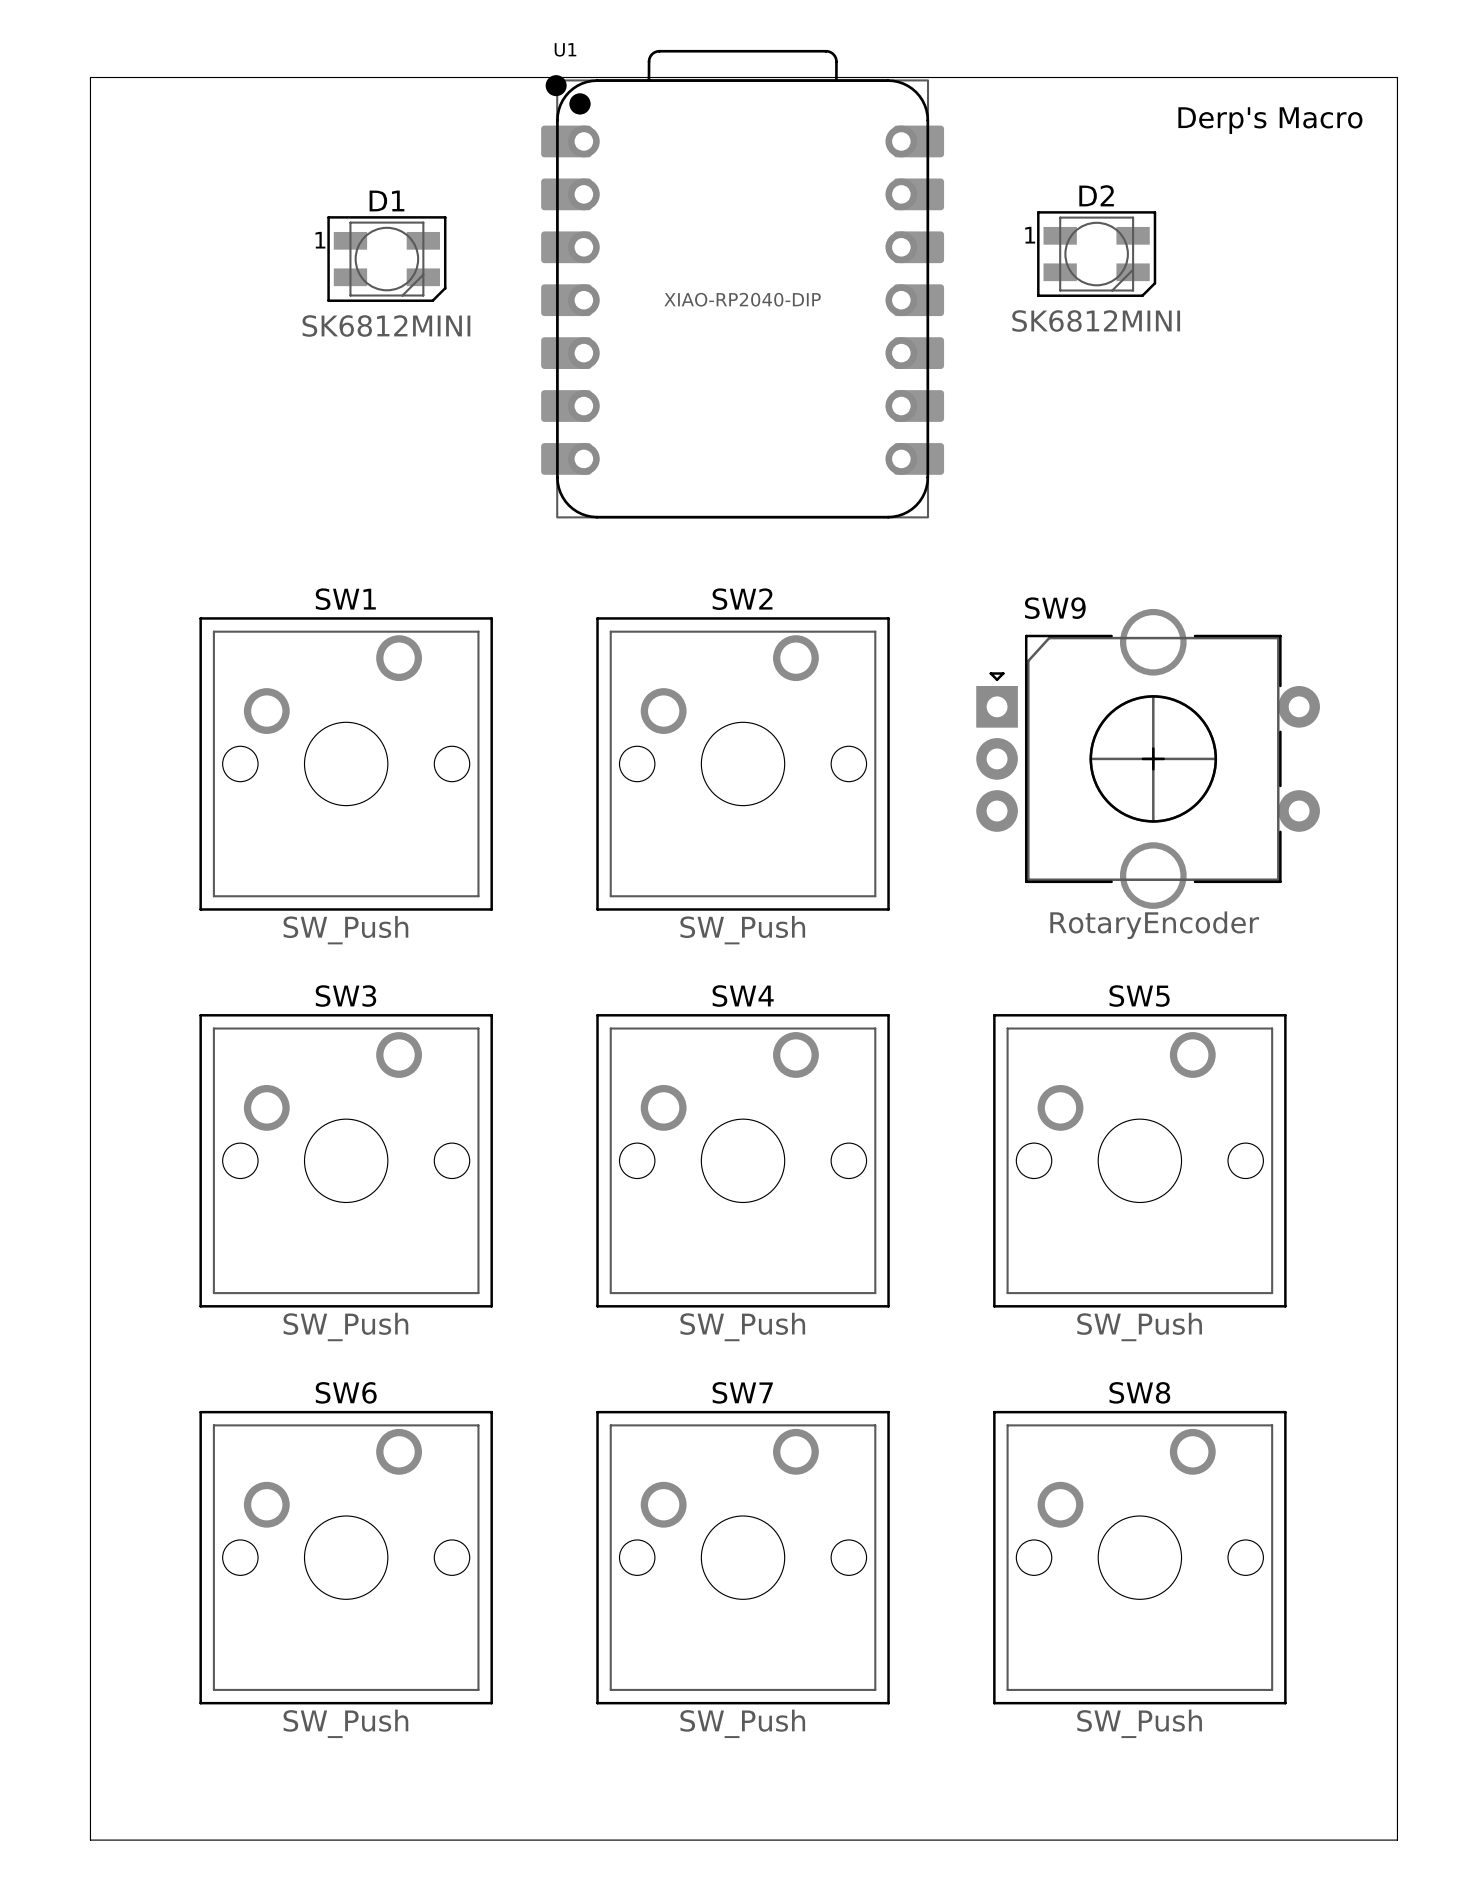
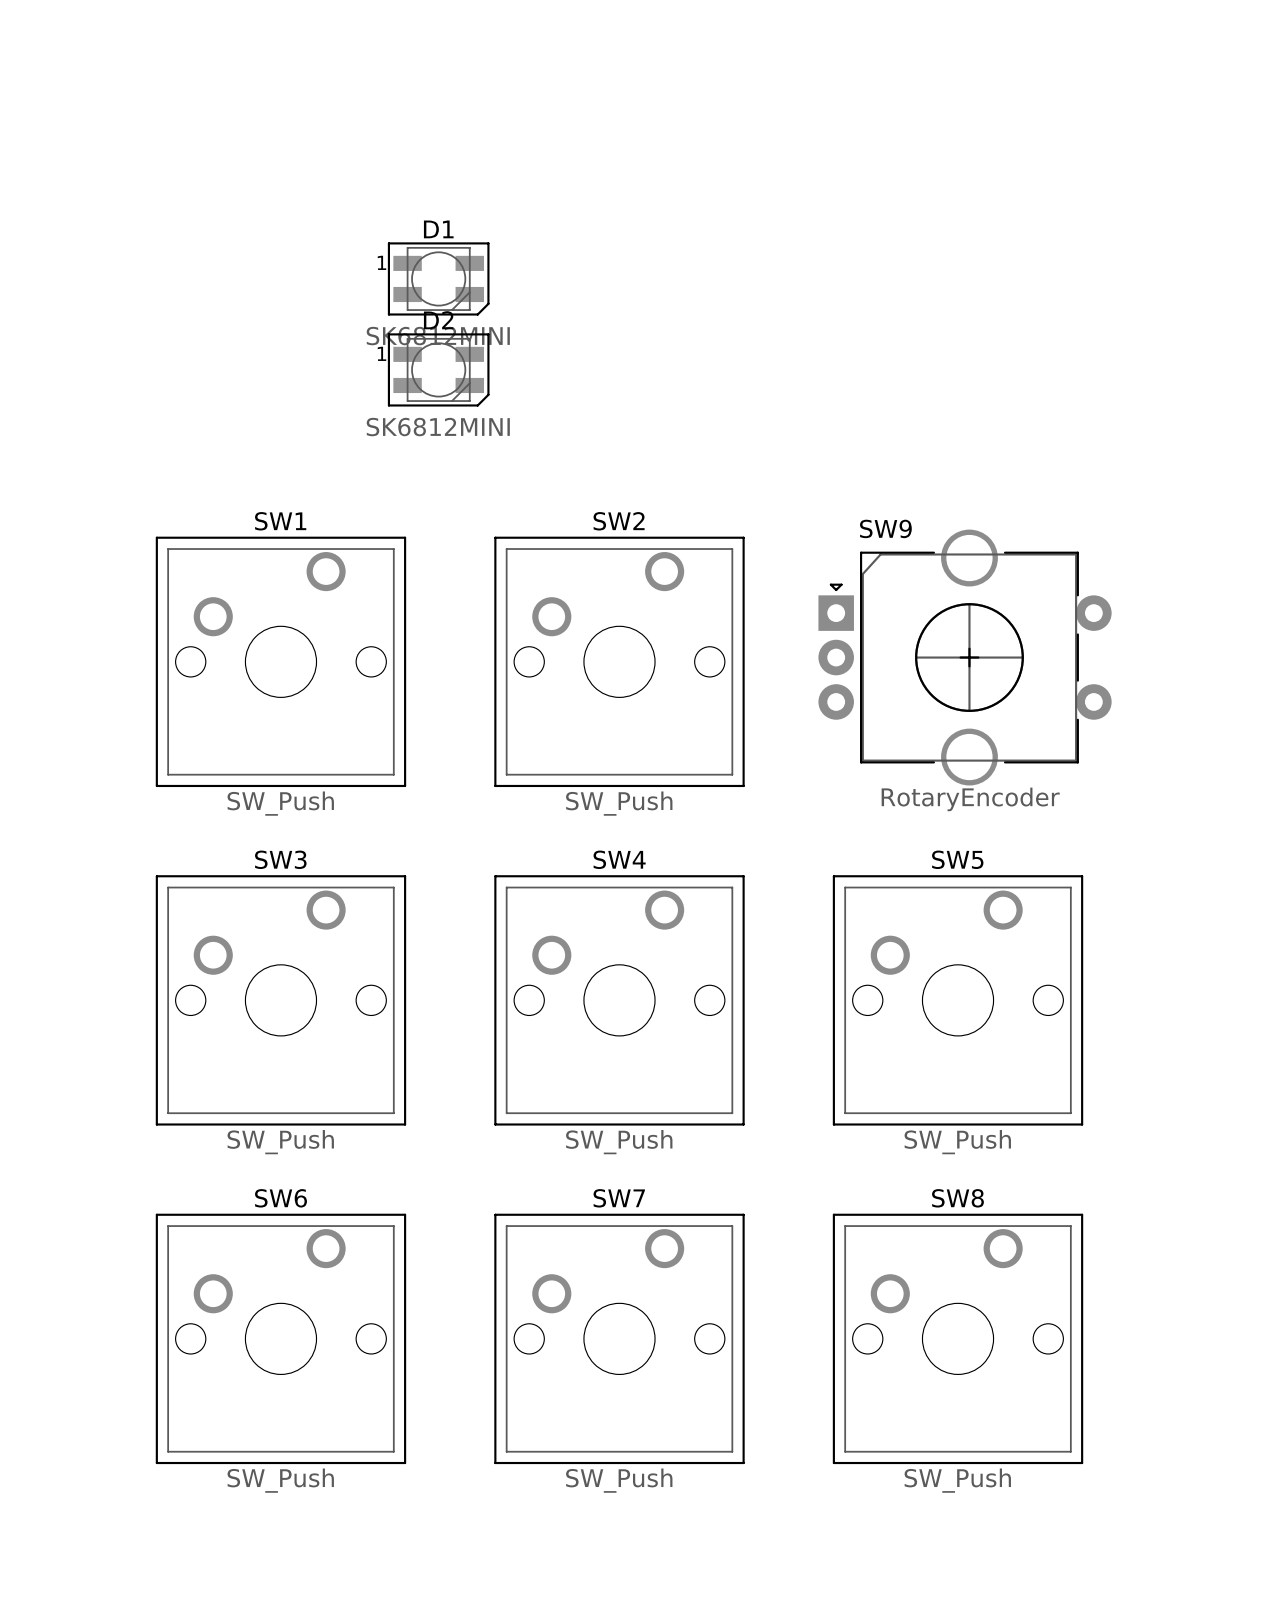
board edge: (90, 77) (1397, 77) (1397, 1840) (90, 1840) (90, 77) -> none
text: Derp's Macro (1270, 120) -> none
D2 position: (1096, 254) -> (438, 369)
D1 position: (386, 259) -> (438, 278)
U1: XIAO-RP2040-DIP (742, 284) -> none

